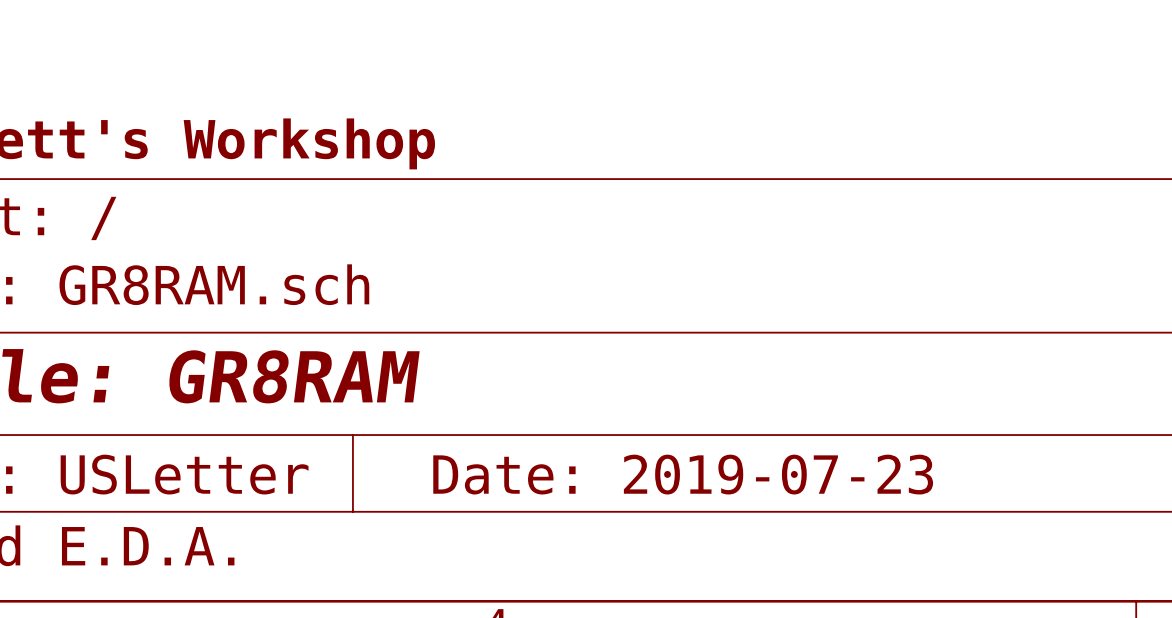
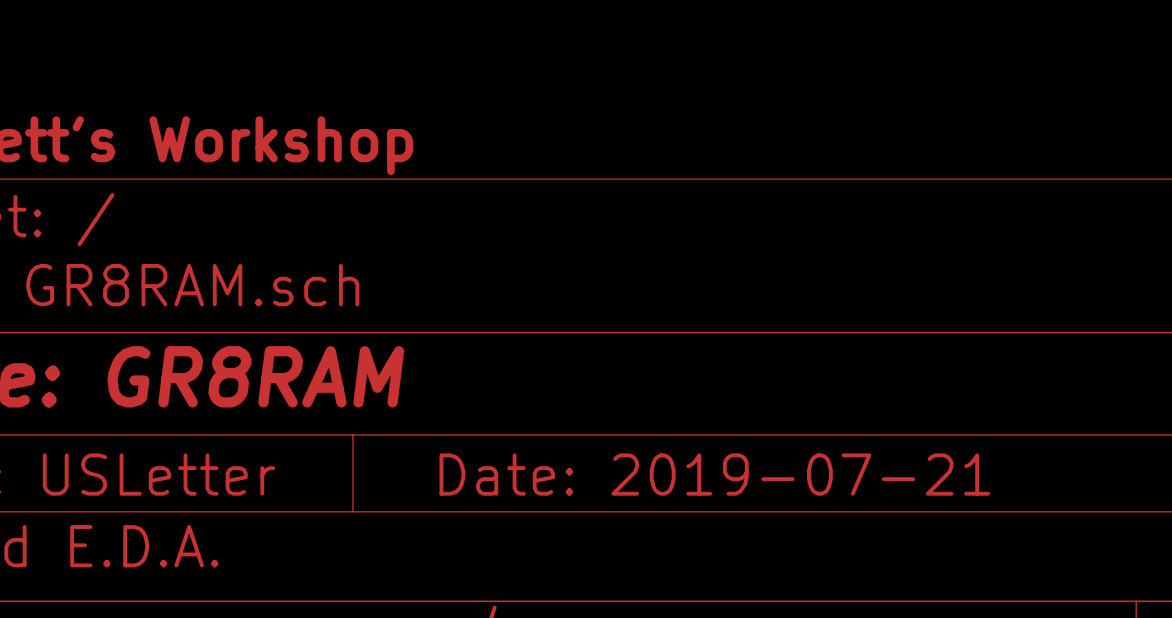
title block: Date: 2019-07-23 (683, 474) -> Date: 2019-07-21 (714, 474)

